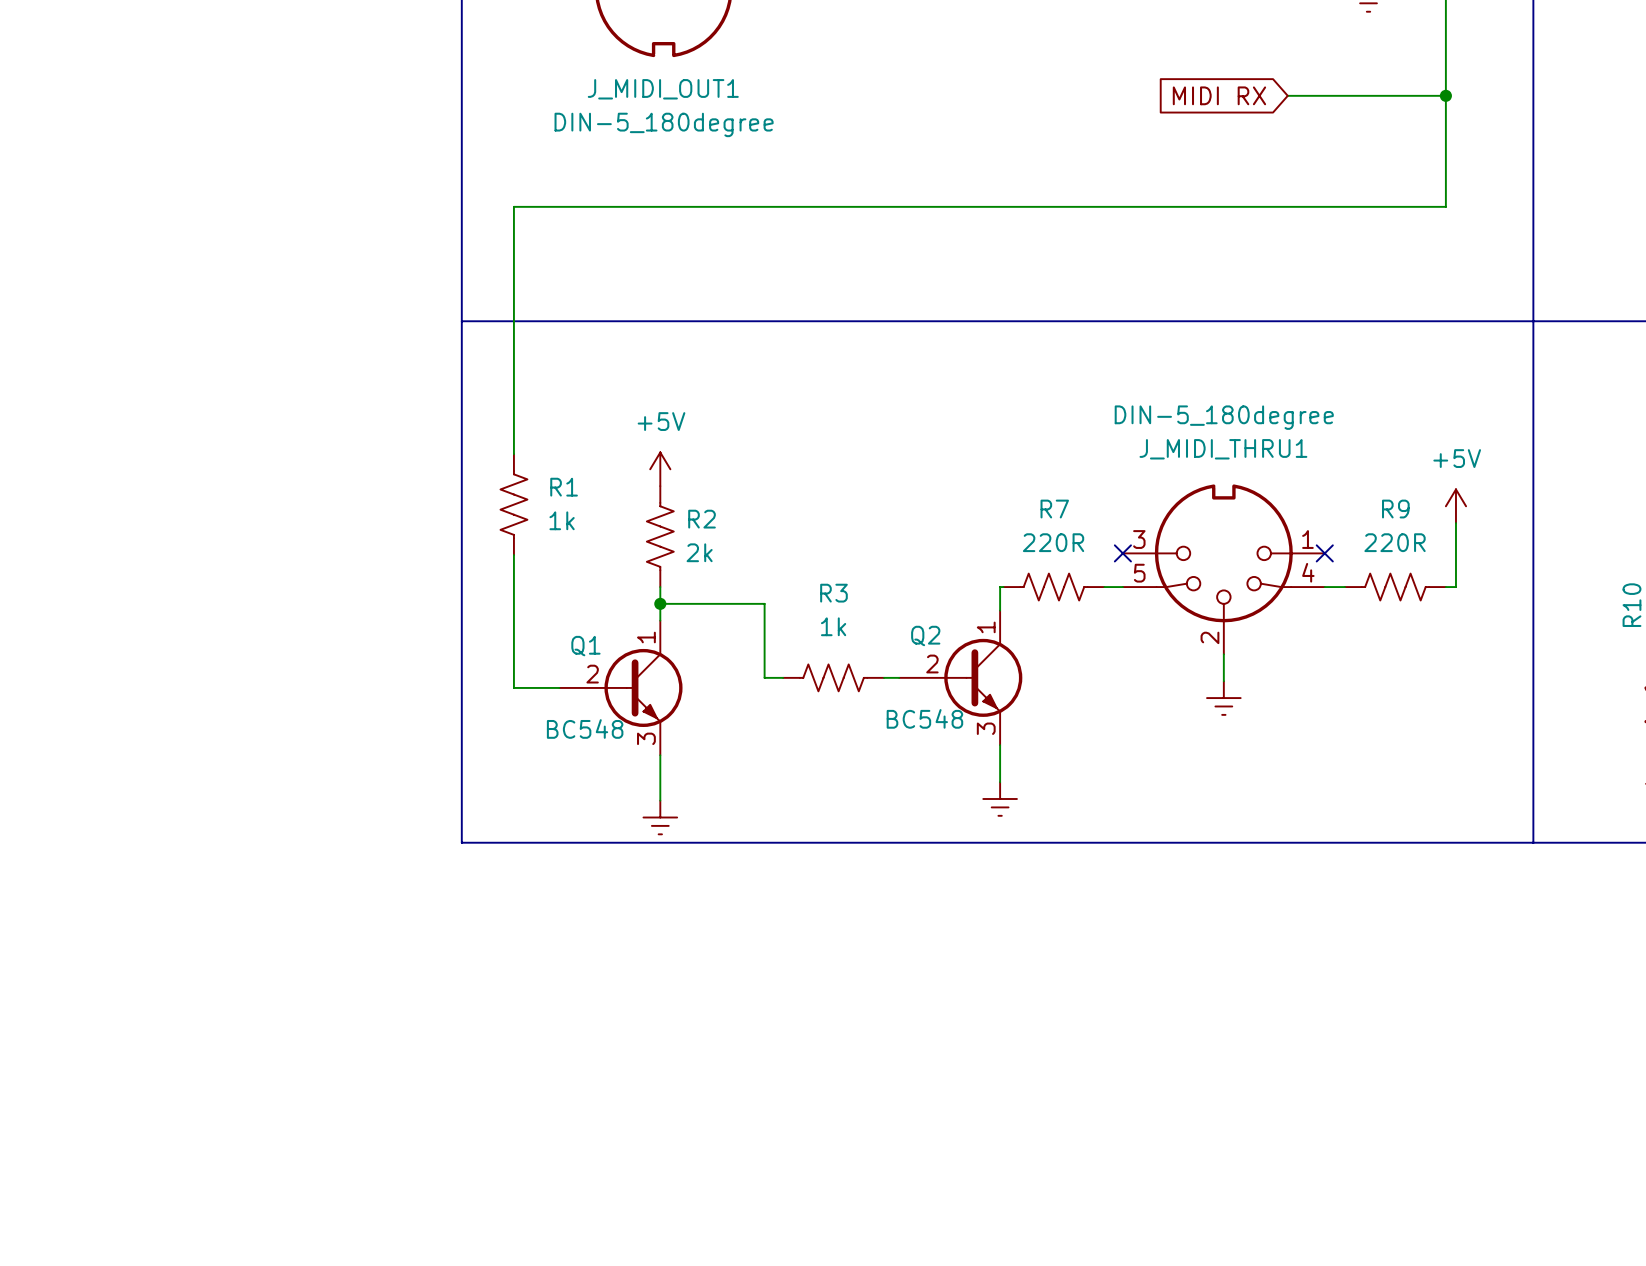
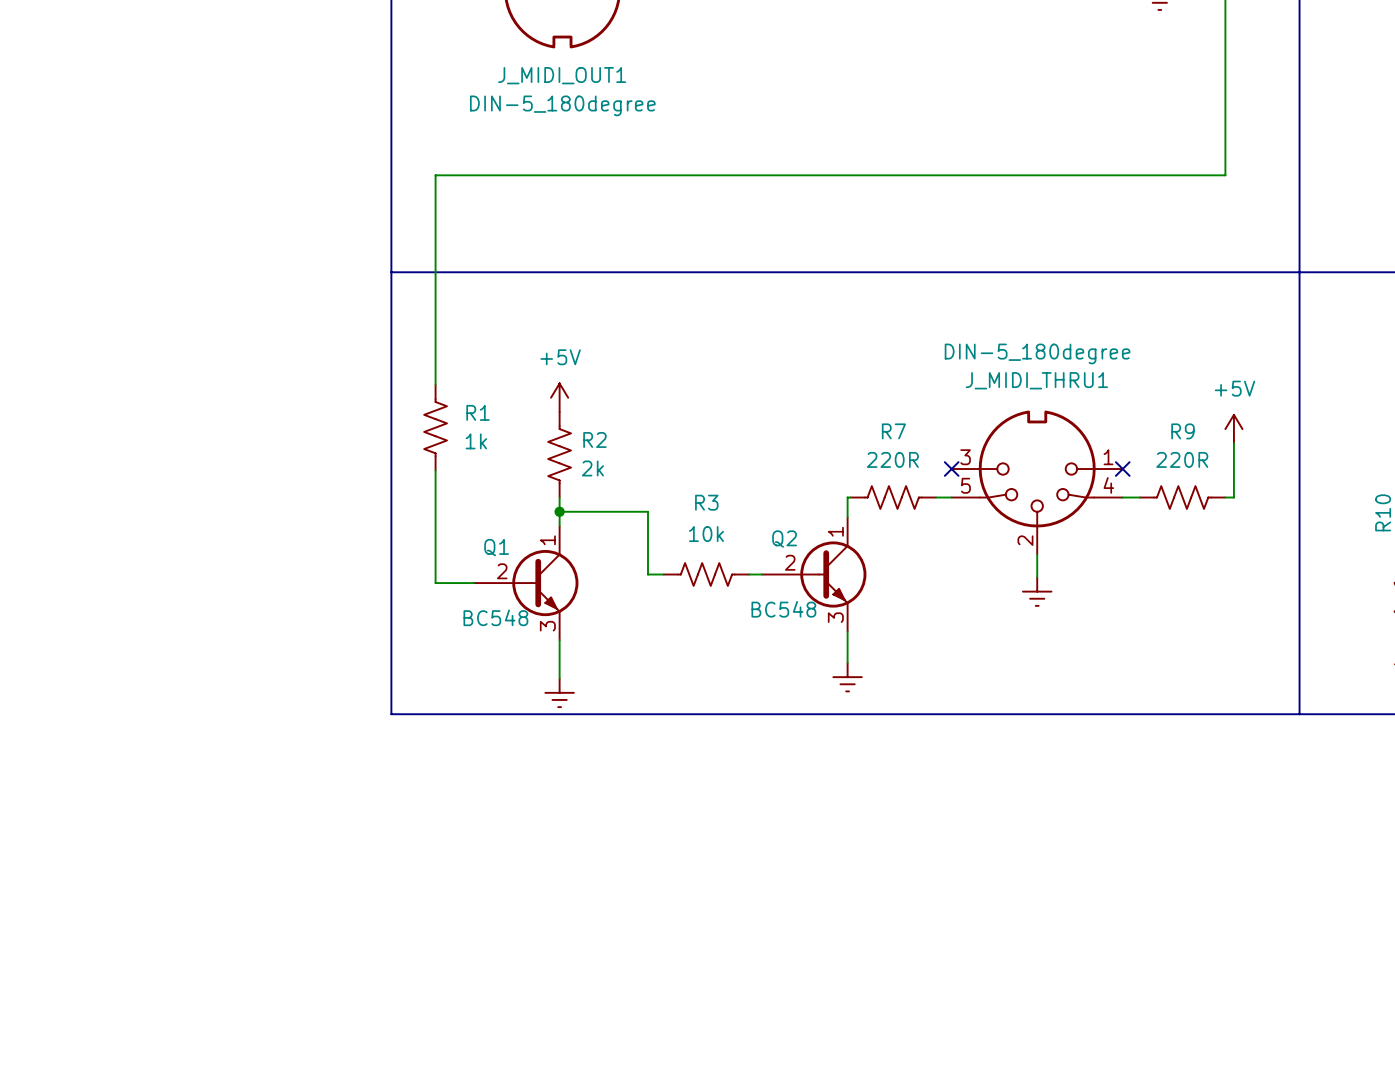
global label: MIDI RX (1219, 95) -> none
wire: (1287, 95) (1445, 95) -> none
junction: (1445, 95) -> none
R3 value: 1k (833, 626) -> 10k (706, 534)

